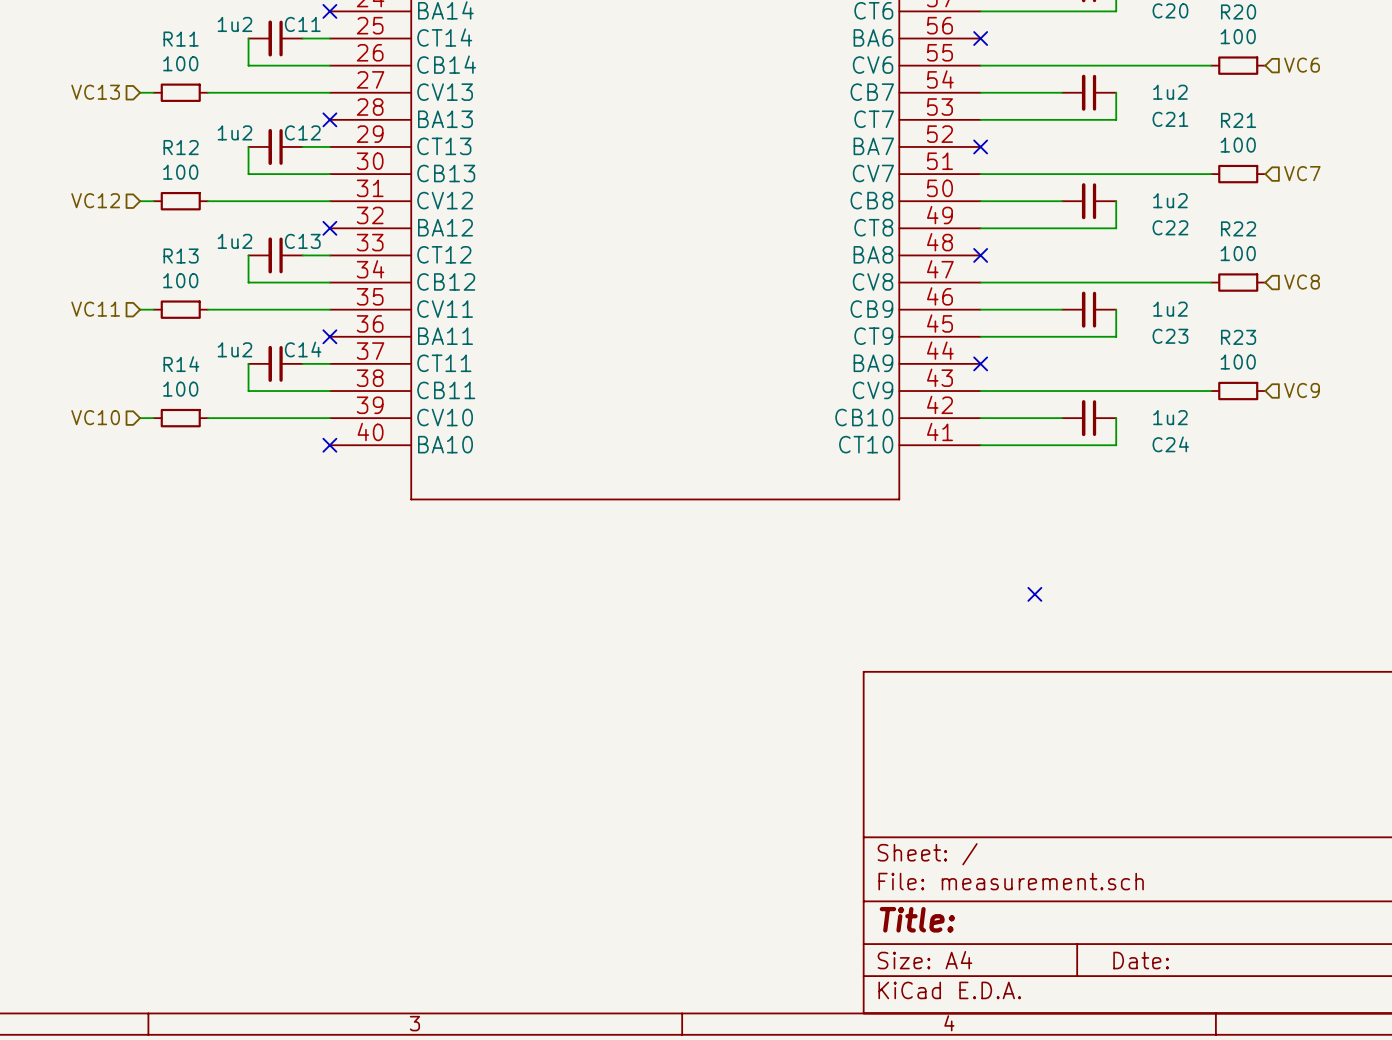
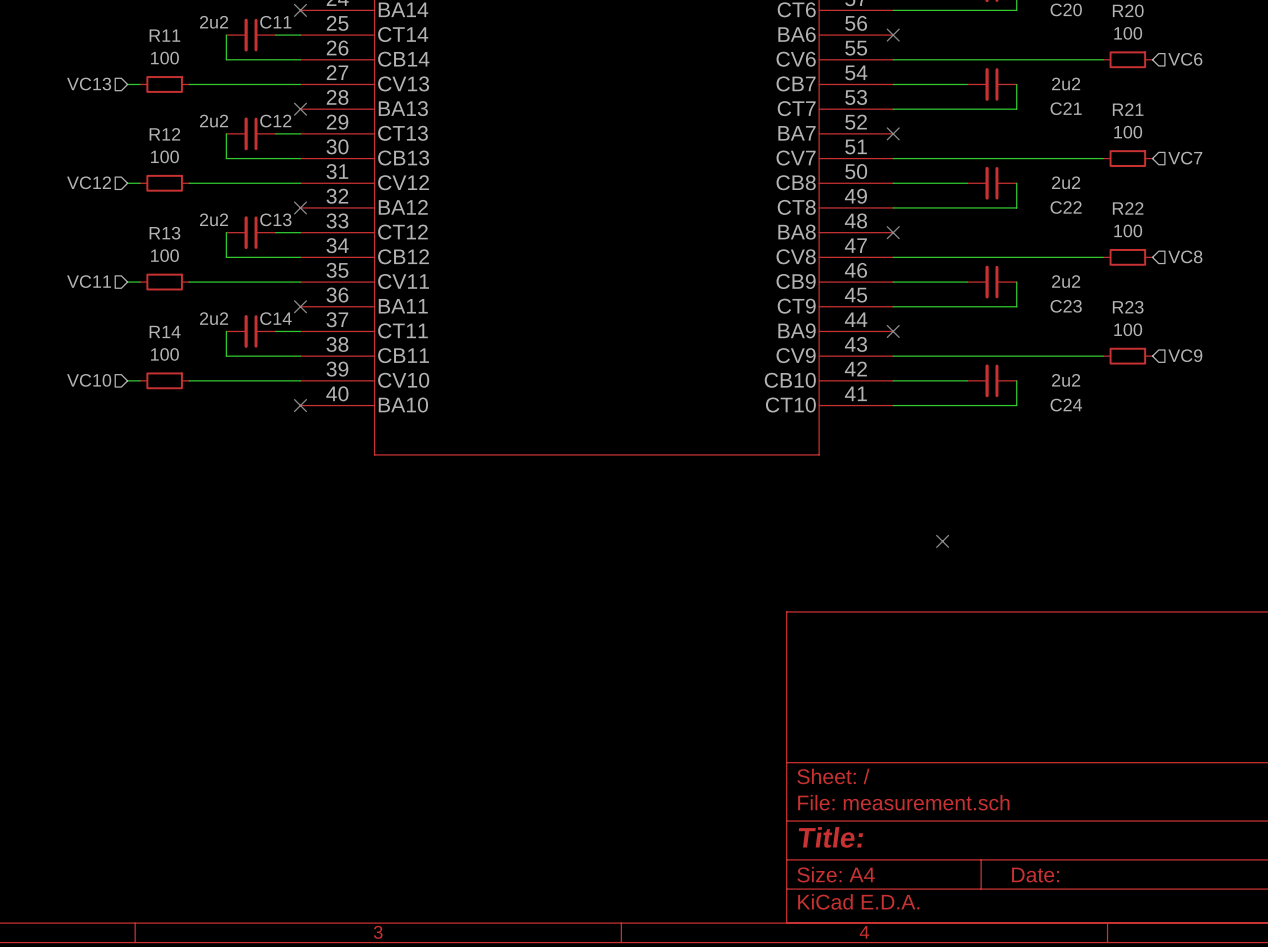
C11 value: 1u2 (234, 24) -> 2u2 (214, 22)
C21 value: 1u2 (1170, 92) -> 2u2 (1066, 84)
C12 value: 1u2 (234, 132) -> 2u2 (214, 121)
C22 value: 1u2 (1170, 200) -> 2u2 (1066, 182)
C13 value: 1u2 (234, 241) -> 2u2 (214, 219)
C23 value: 1u2 (1170, 309) -> 2u2 (1066, 281)
C14 value: 1u2 (234, 349) -> 2u2 (214, 318)
C24 value: 1u2 (1170, 417) -> 2u2 (1066, 380)

